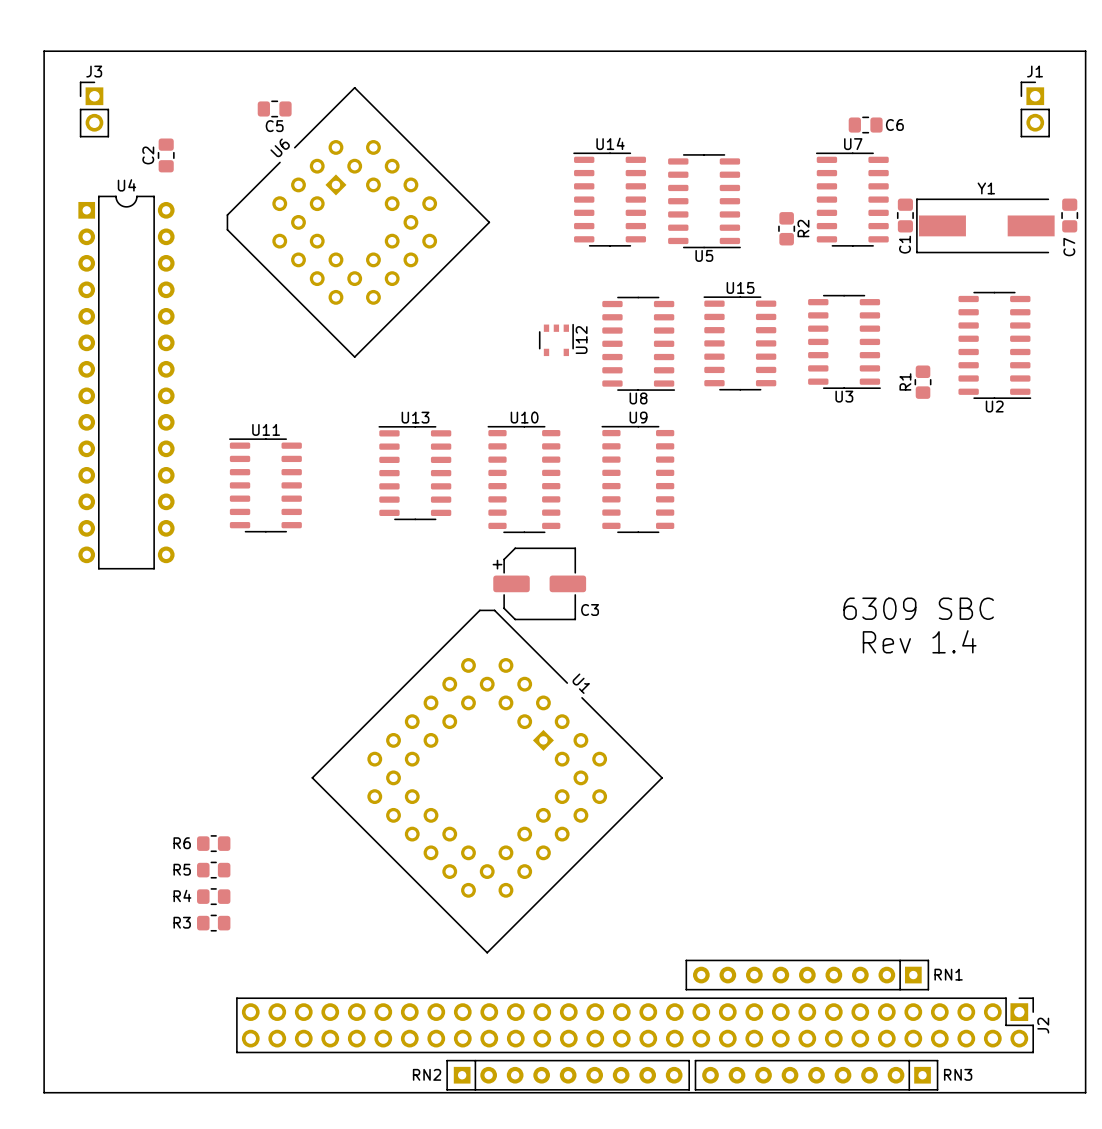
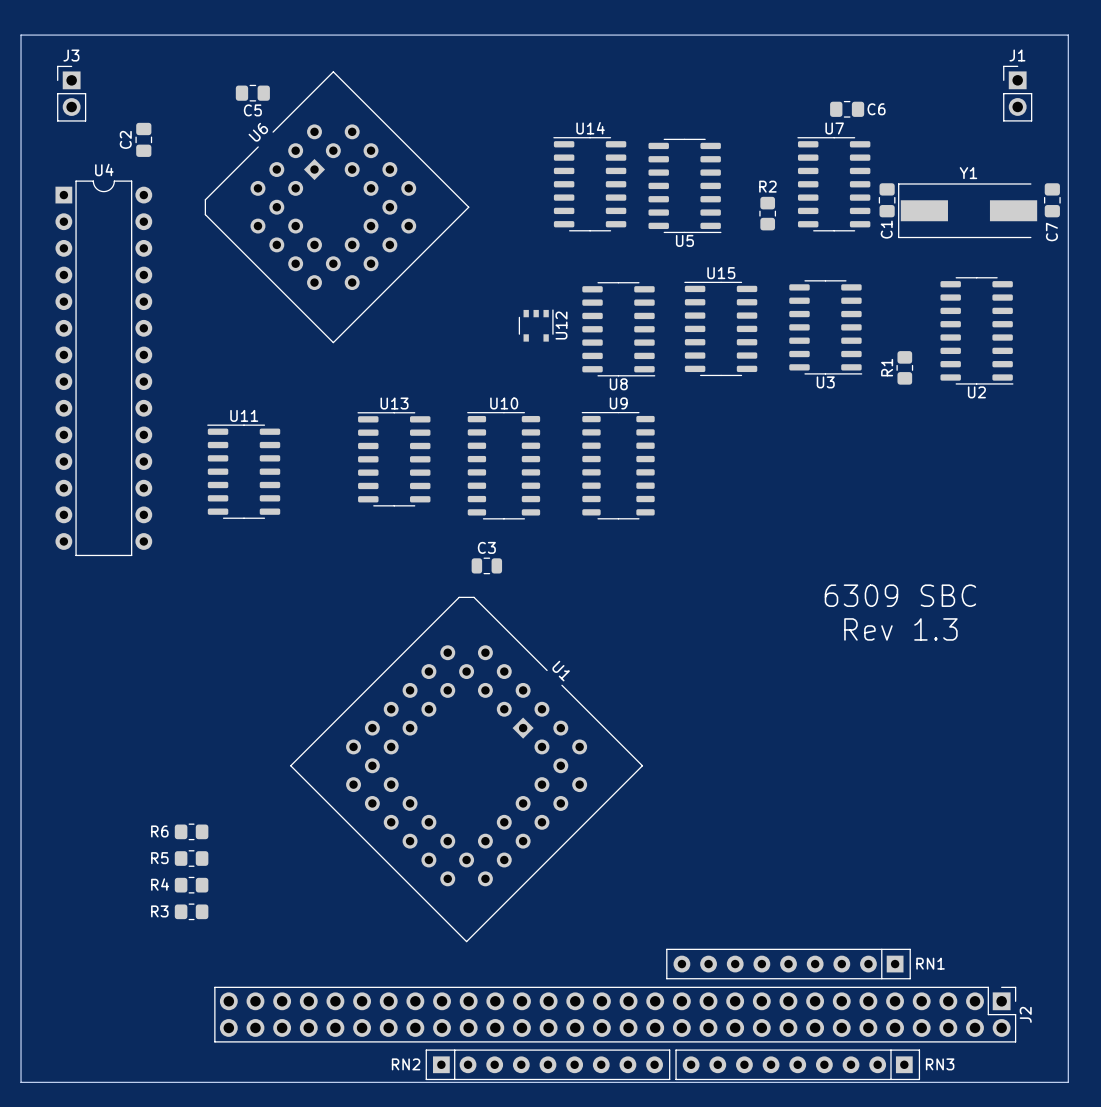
R2 name rotation: 0° (803, 228) -> 90° clockwise (767, 186)
R2 name position: R2 (803, 228) -> R2 (767, 186)
C3 footprint: [492, 547, 587, 621] -> [471, 557, 503, 575]
C3 name position: C3 (590, 610) -> C3 (486, 547)
text: Rev 1.4 (919, 641) -> Rev 1.3 (900, 629)

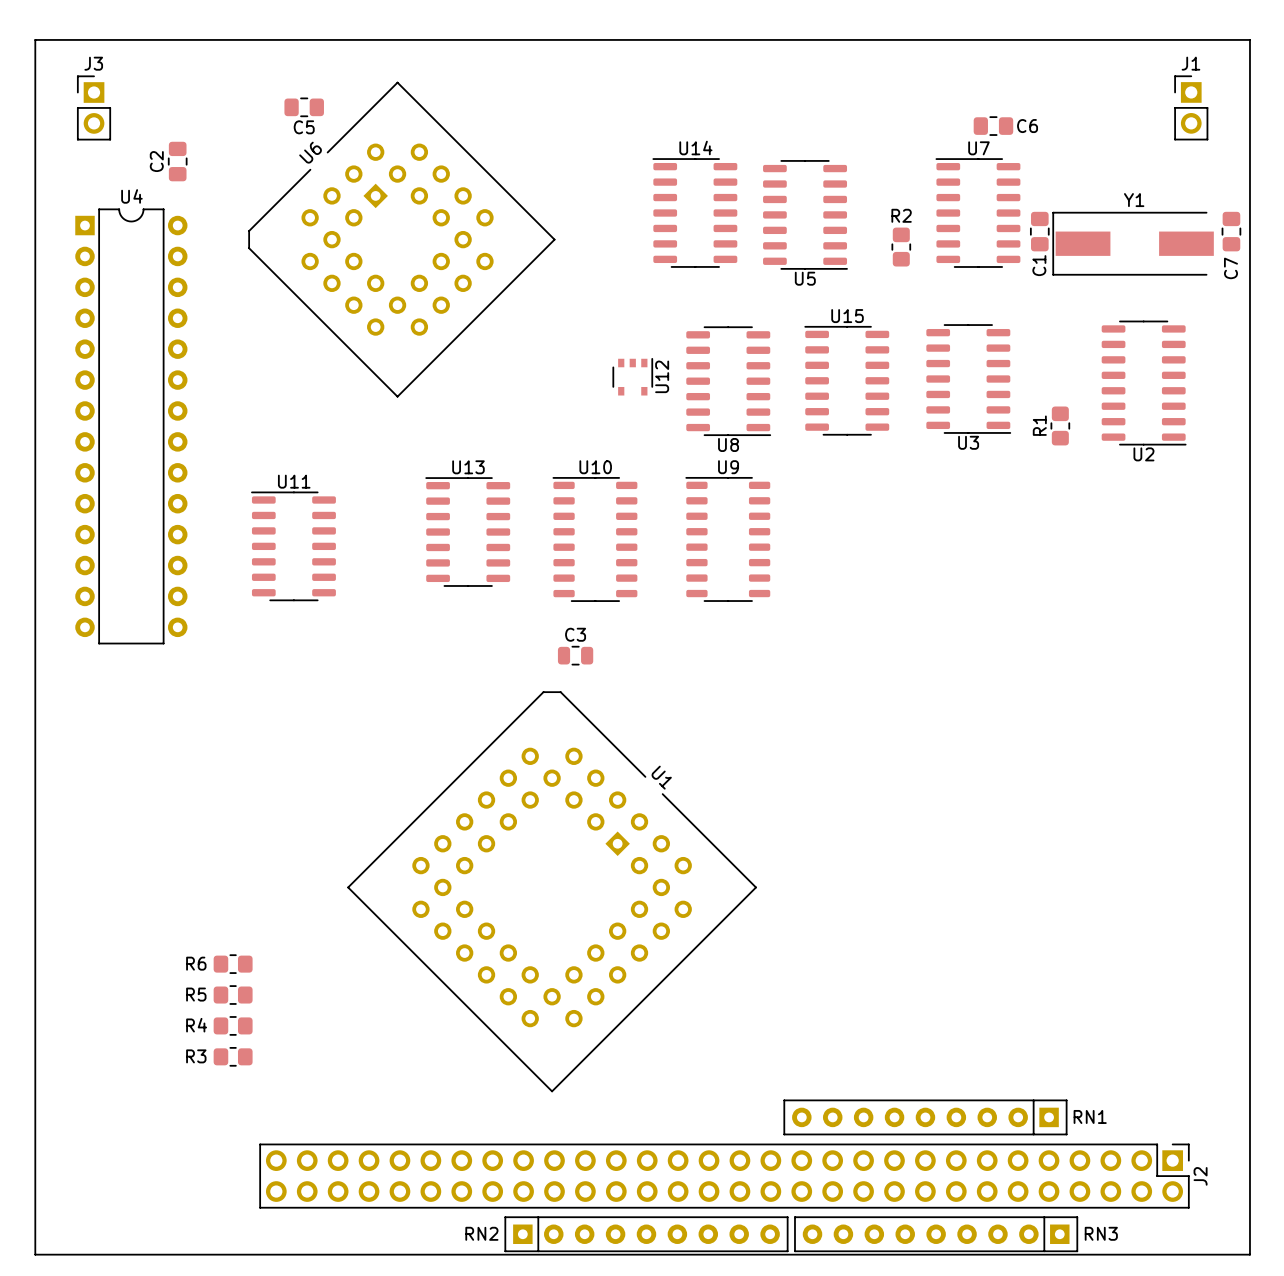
text: 6309 SBC (900, 595) -> none
text: Rev 1.3 (900, 629) -> none

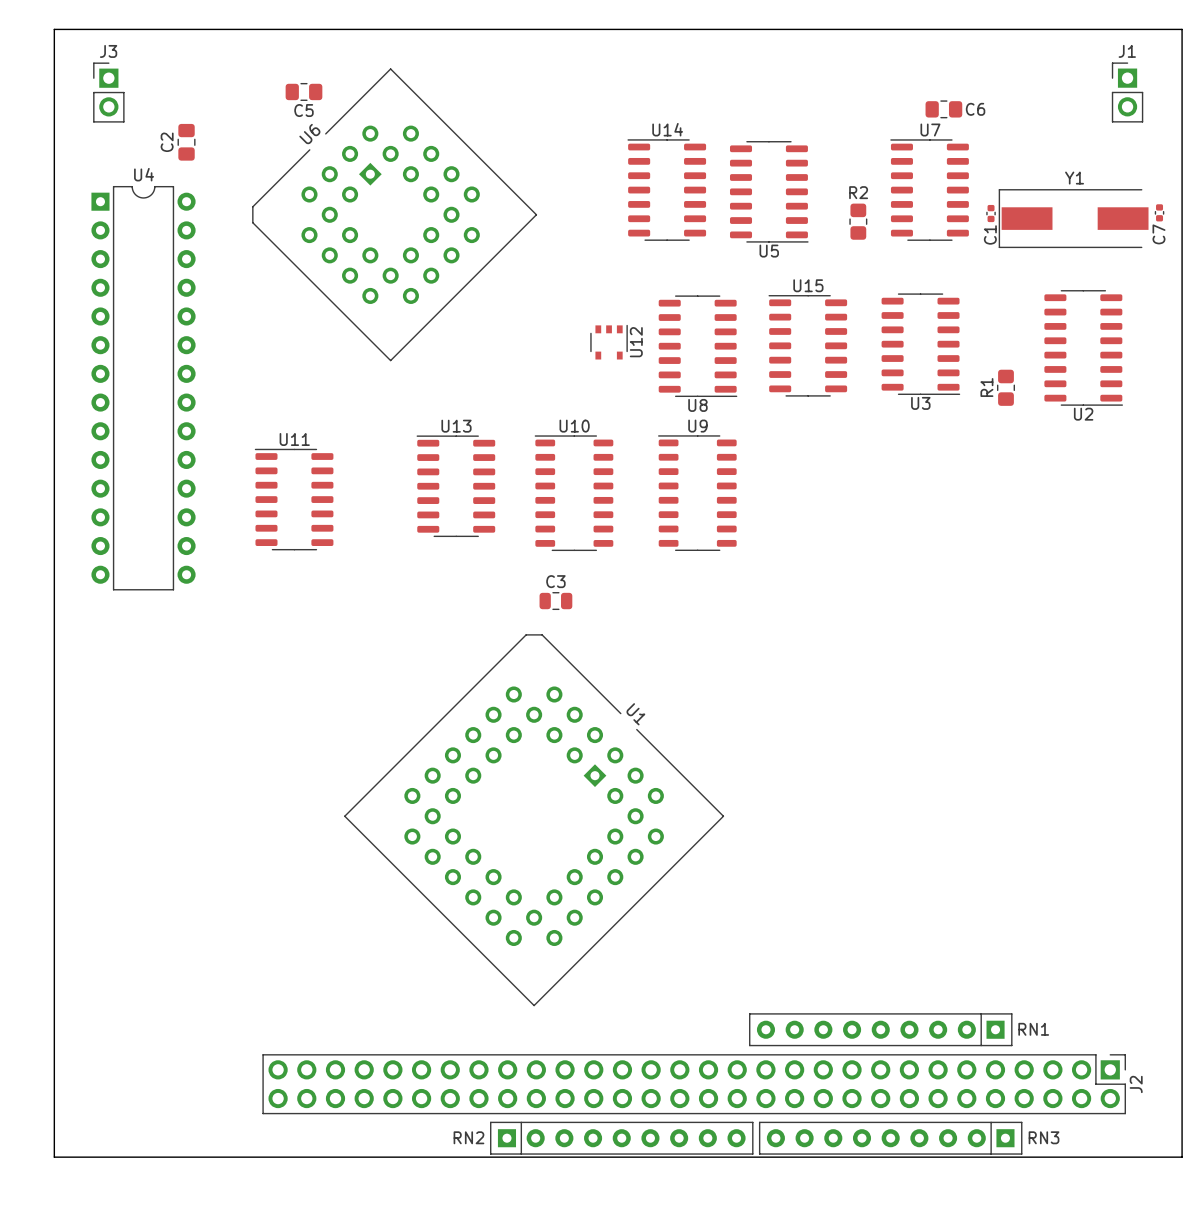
C1 footprint: [1030, 211, 1050, 252] -> [986, 204, 996, 223]
C7 footprint: [1221, 211, 1242, 252] -> [1154, 204, 1165, 222]
R6: (233, 964) -> none
R5: (233, 995) -> none
R4: (233, 1025) -> none
R3: (233, 1056) -> none

